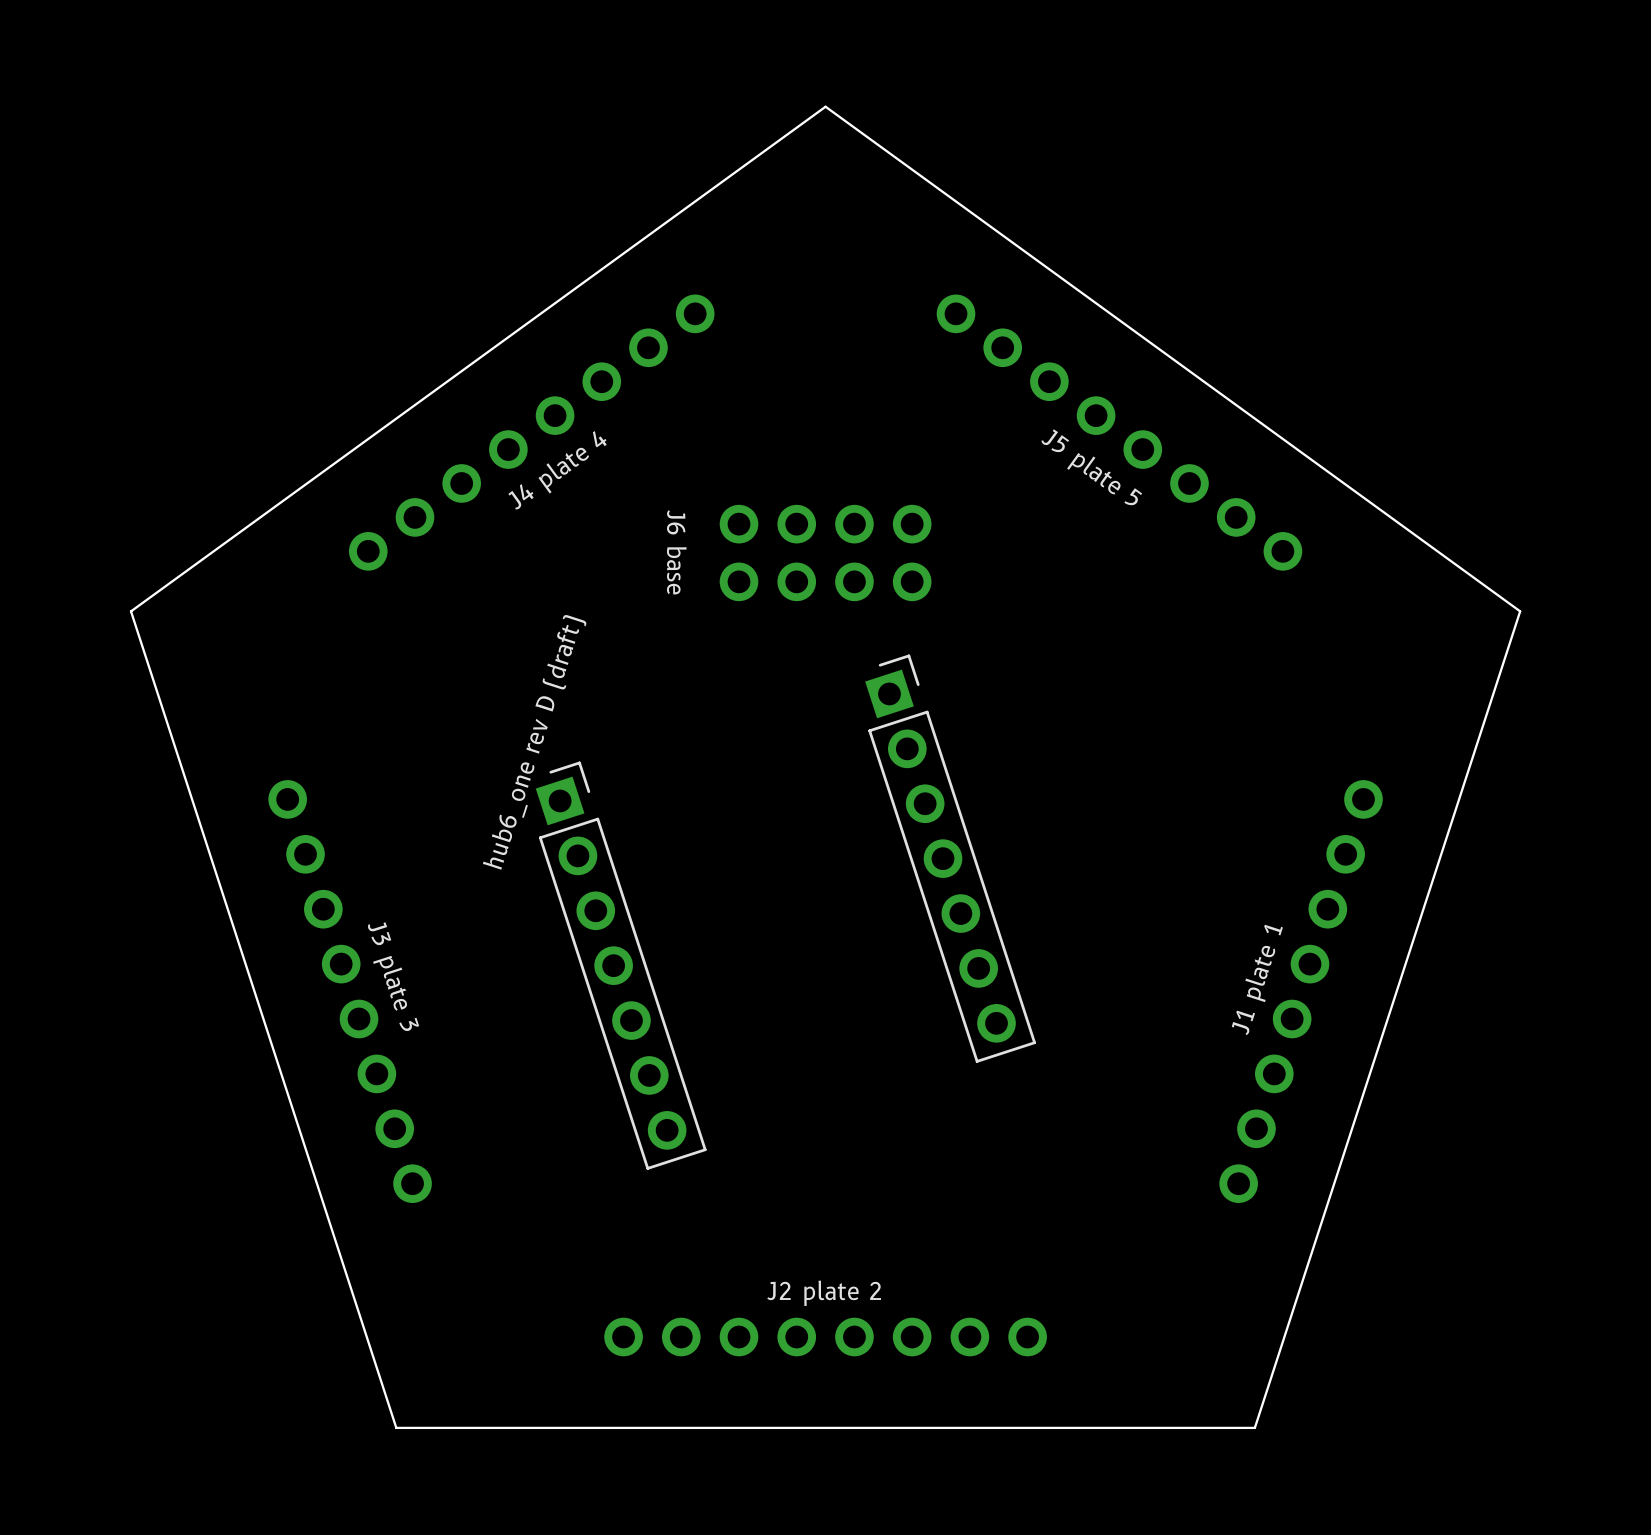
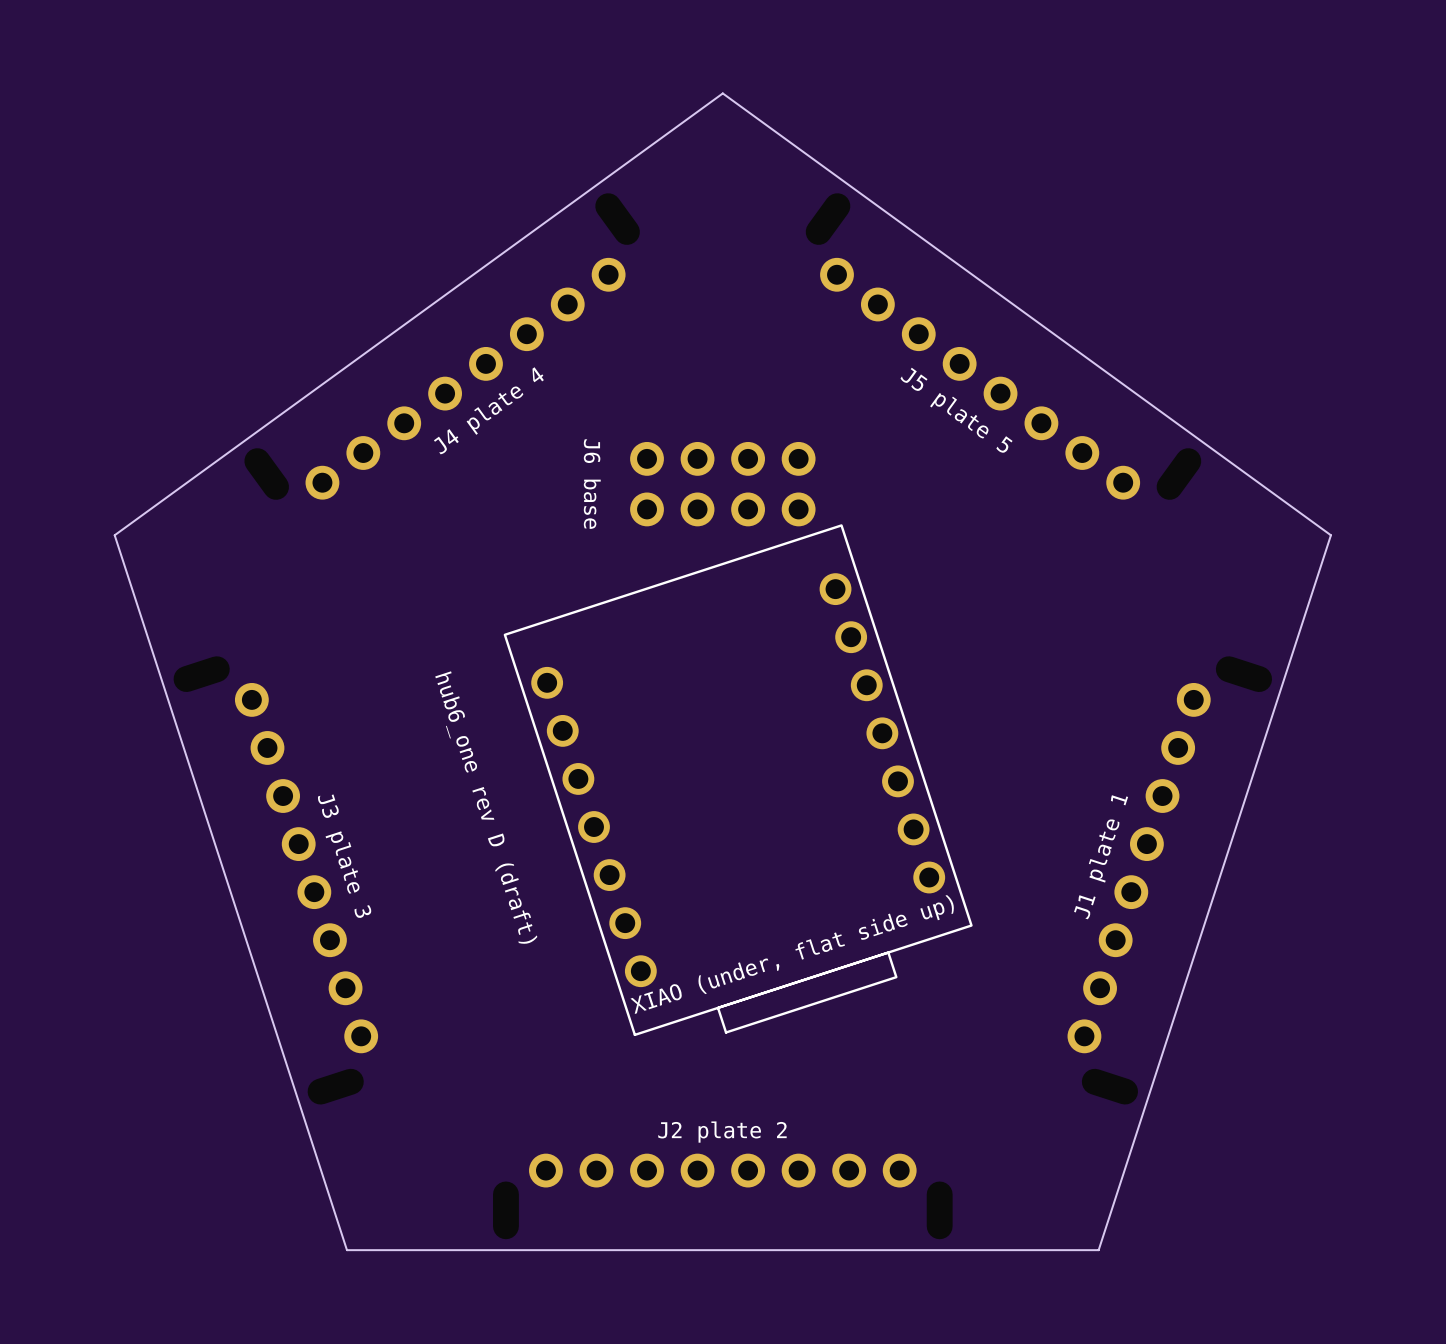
text rotation: 0° (534, 742) -> 144° clockwise (486, 807)
part: (950, 858) -> none
part: none -> (738, 780)
part: (621, 965) -> none

